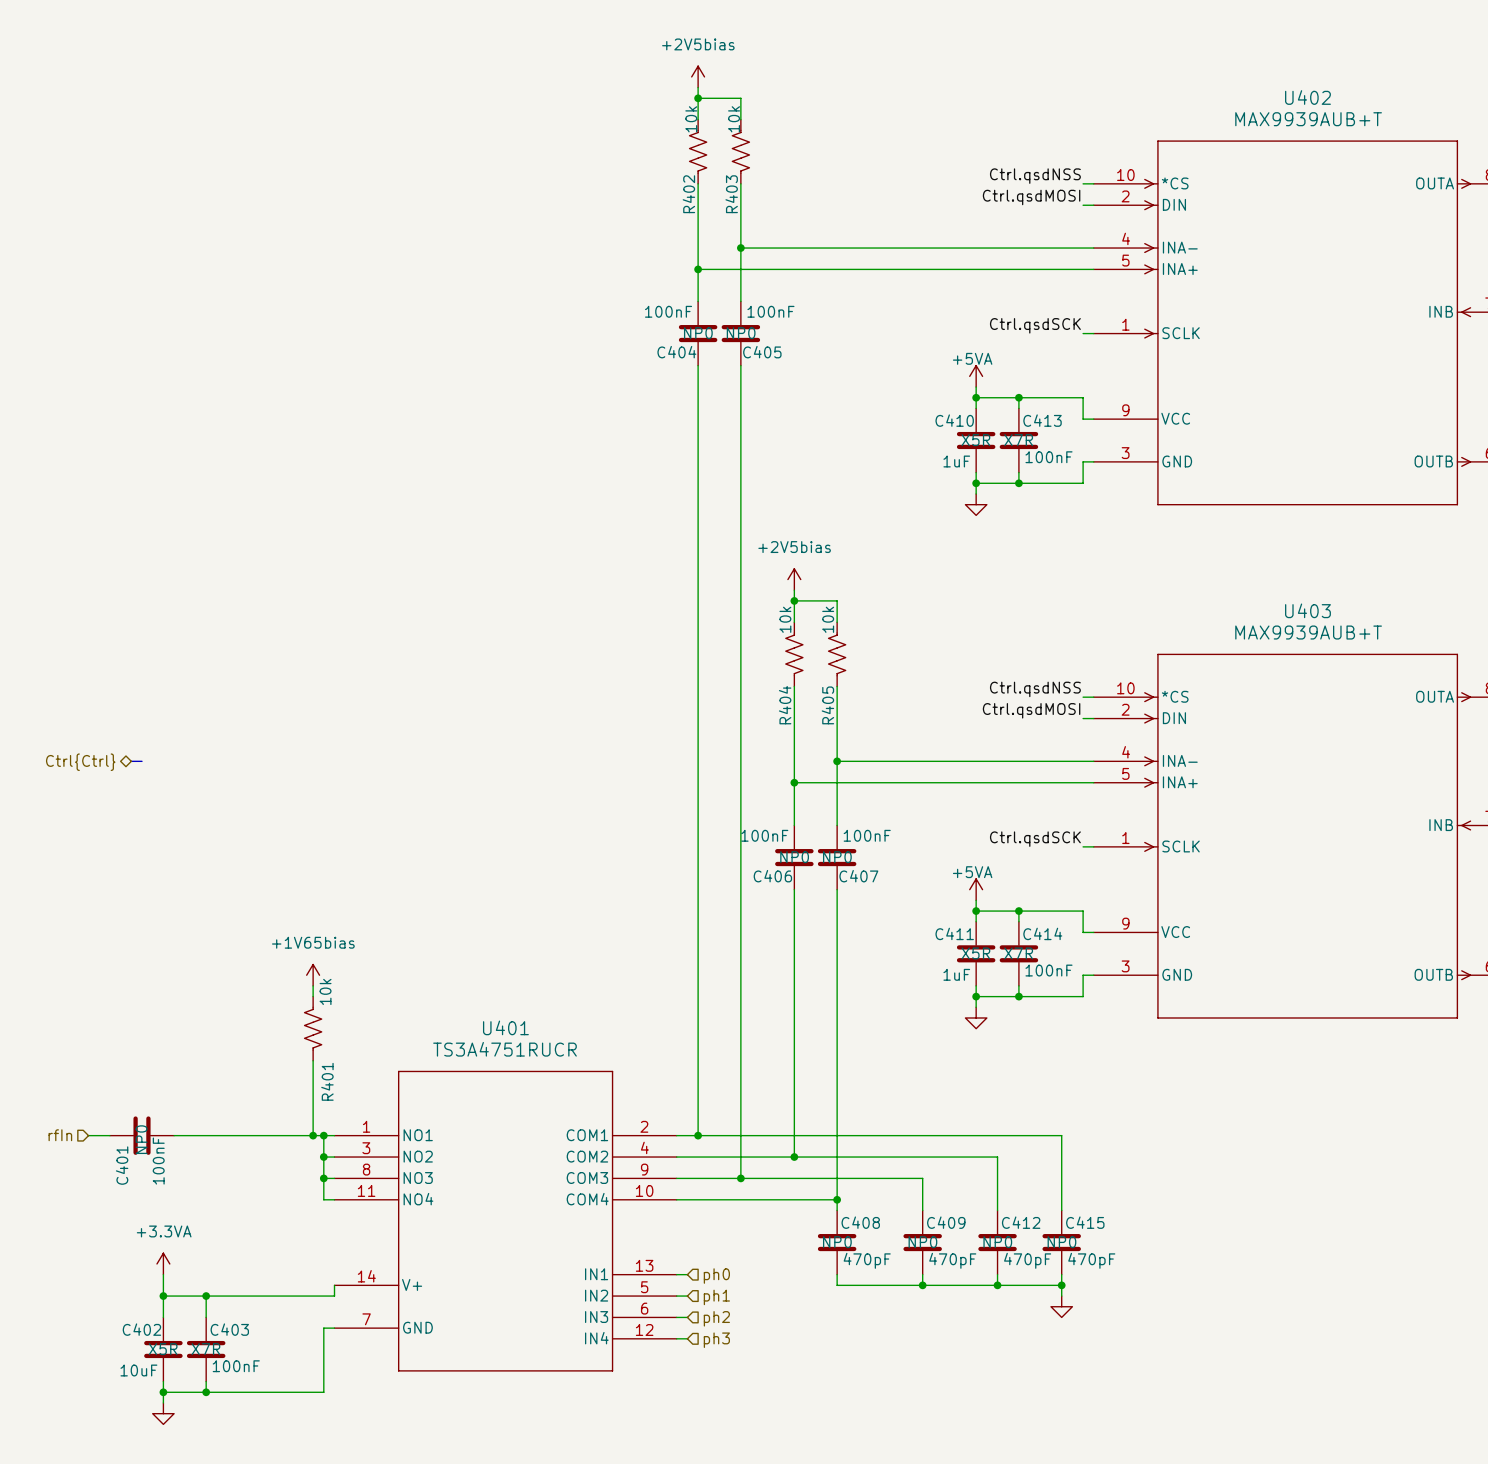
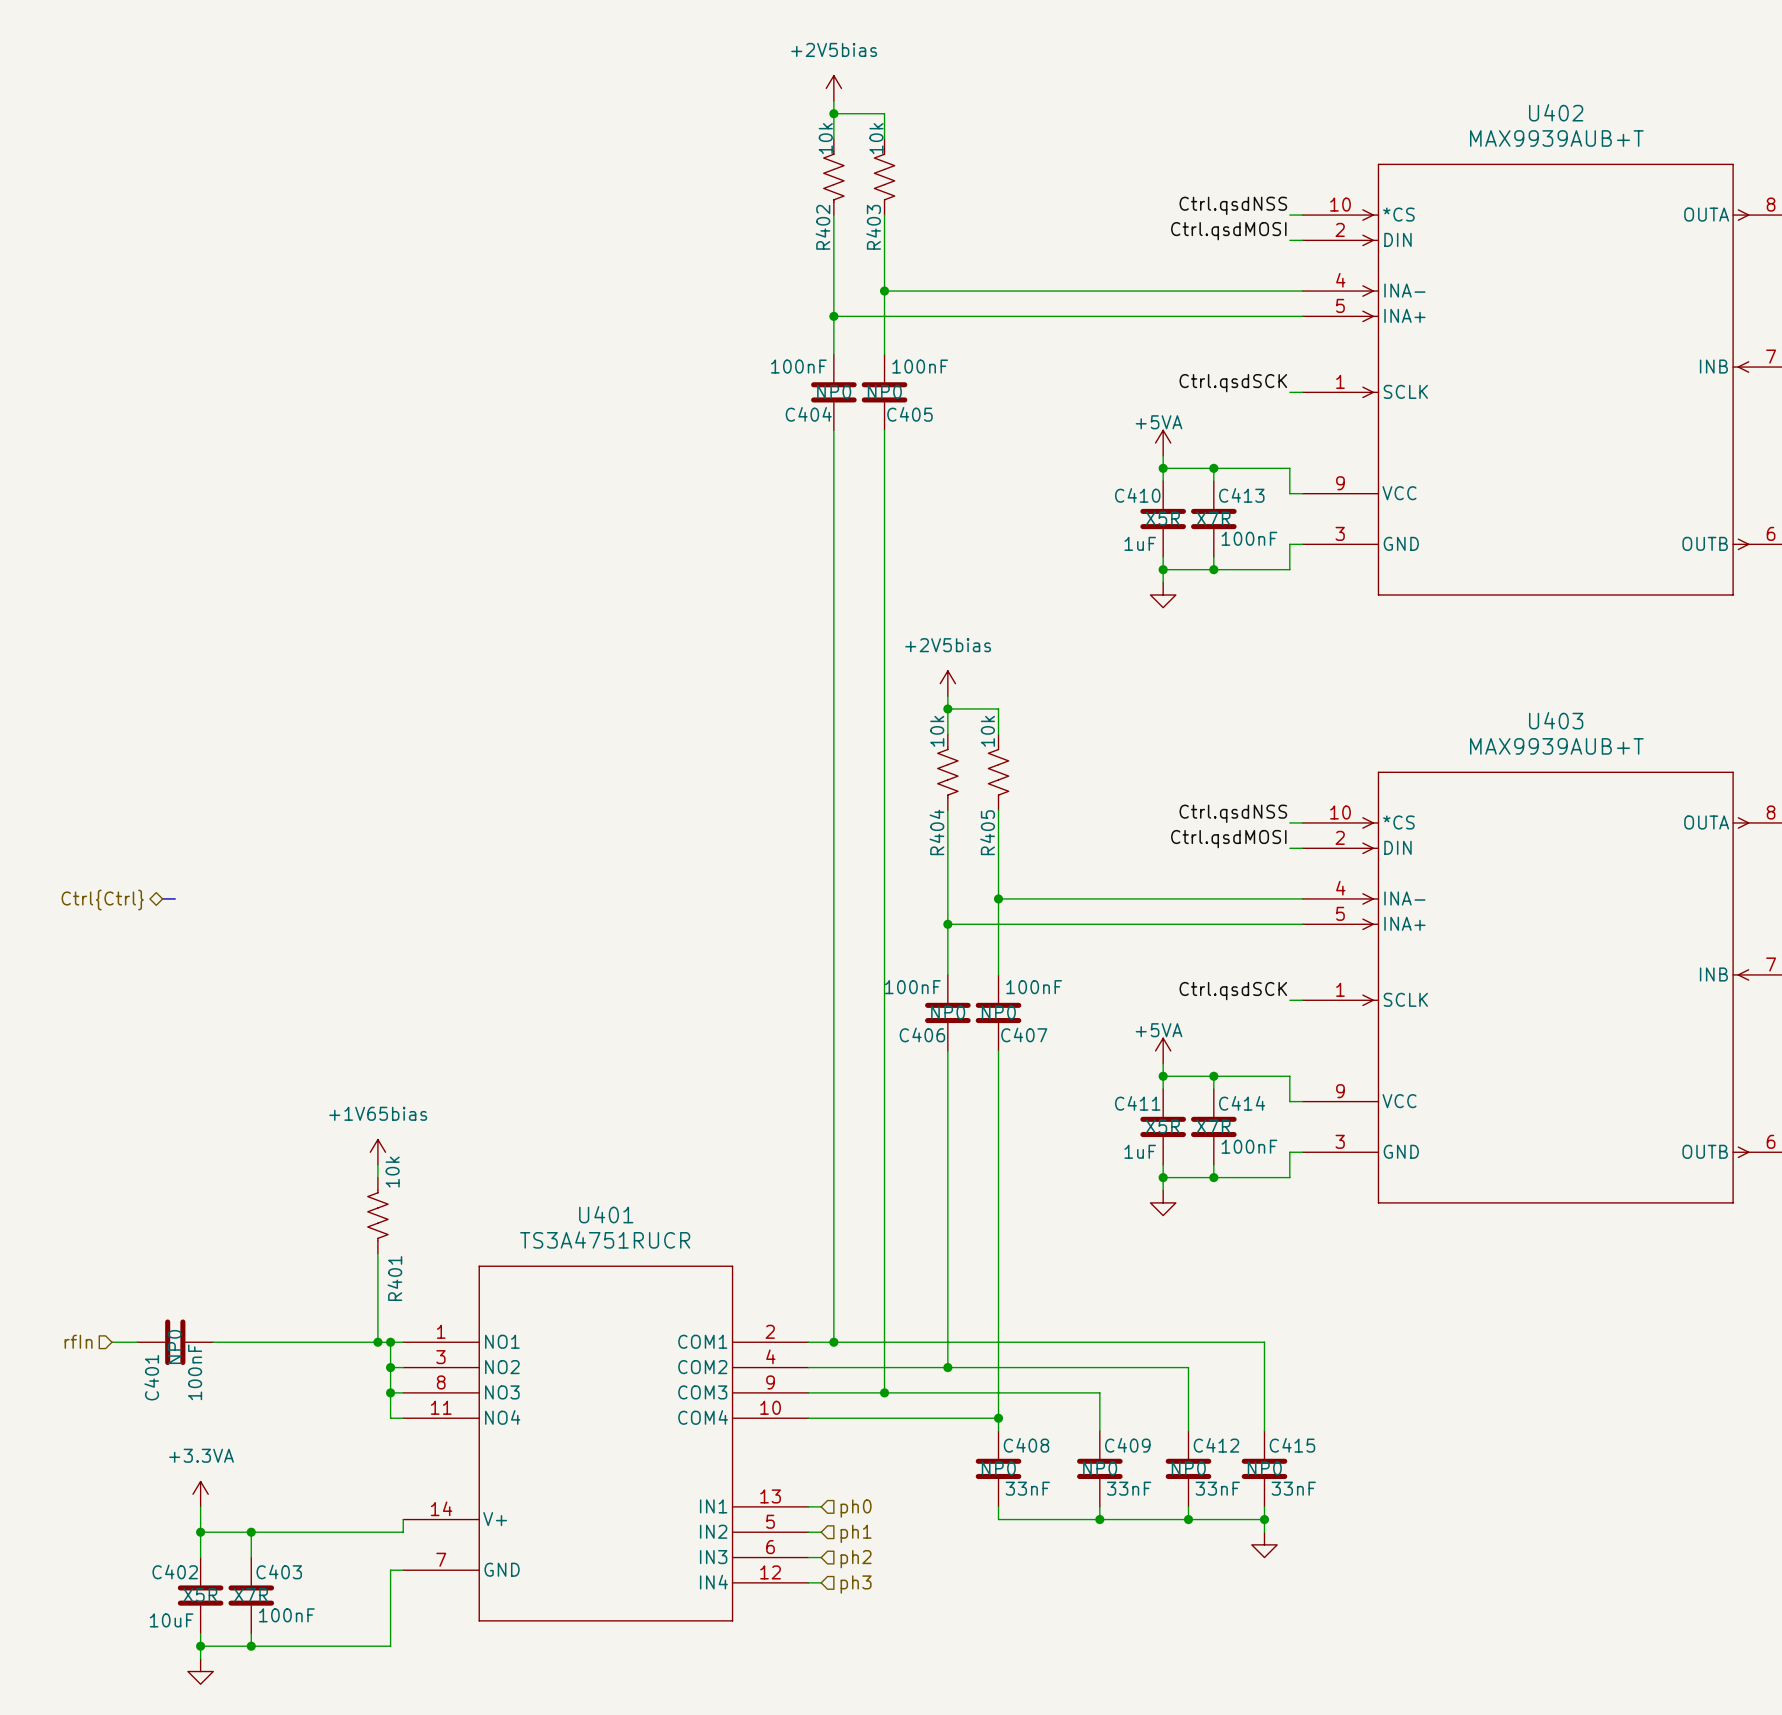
C408 value: 470pF (867, 1260) -> 33nF (1027, 1488)
C409 value: 470pF (952, 1260) -> 33nF (1129, 1488)
C412 value: 470pF (1027, 1260) -> 33nF (1217, 1488)
C415 value: 470pF (1091, 1260) -> 33nF (1293, 1488)

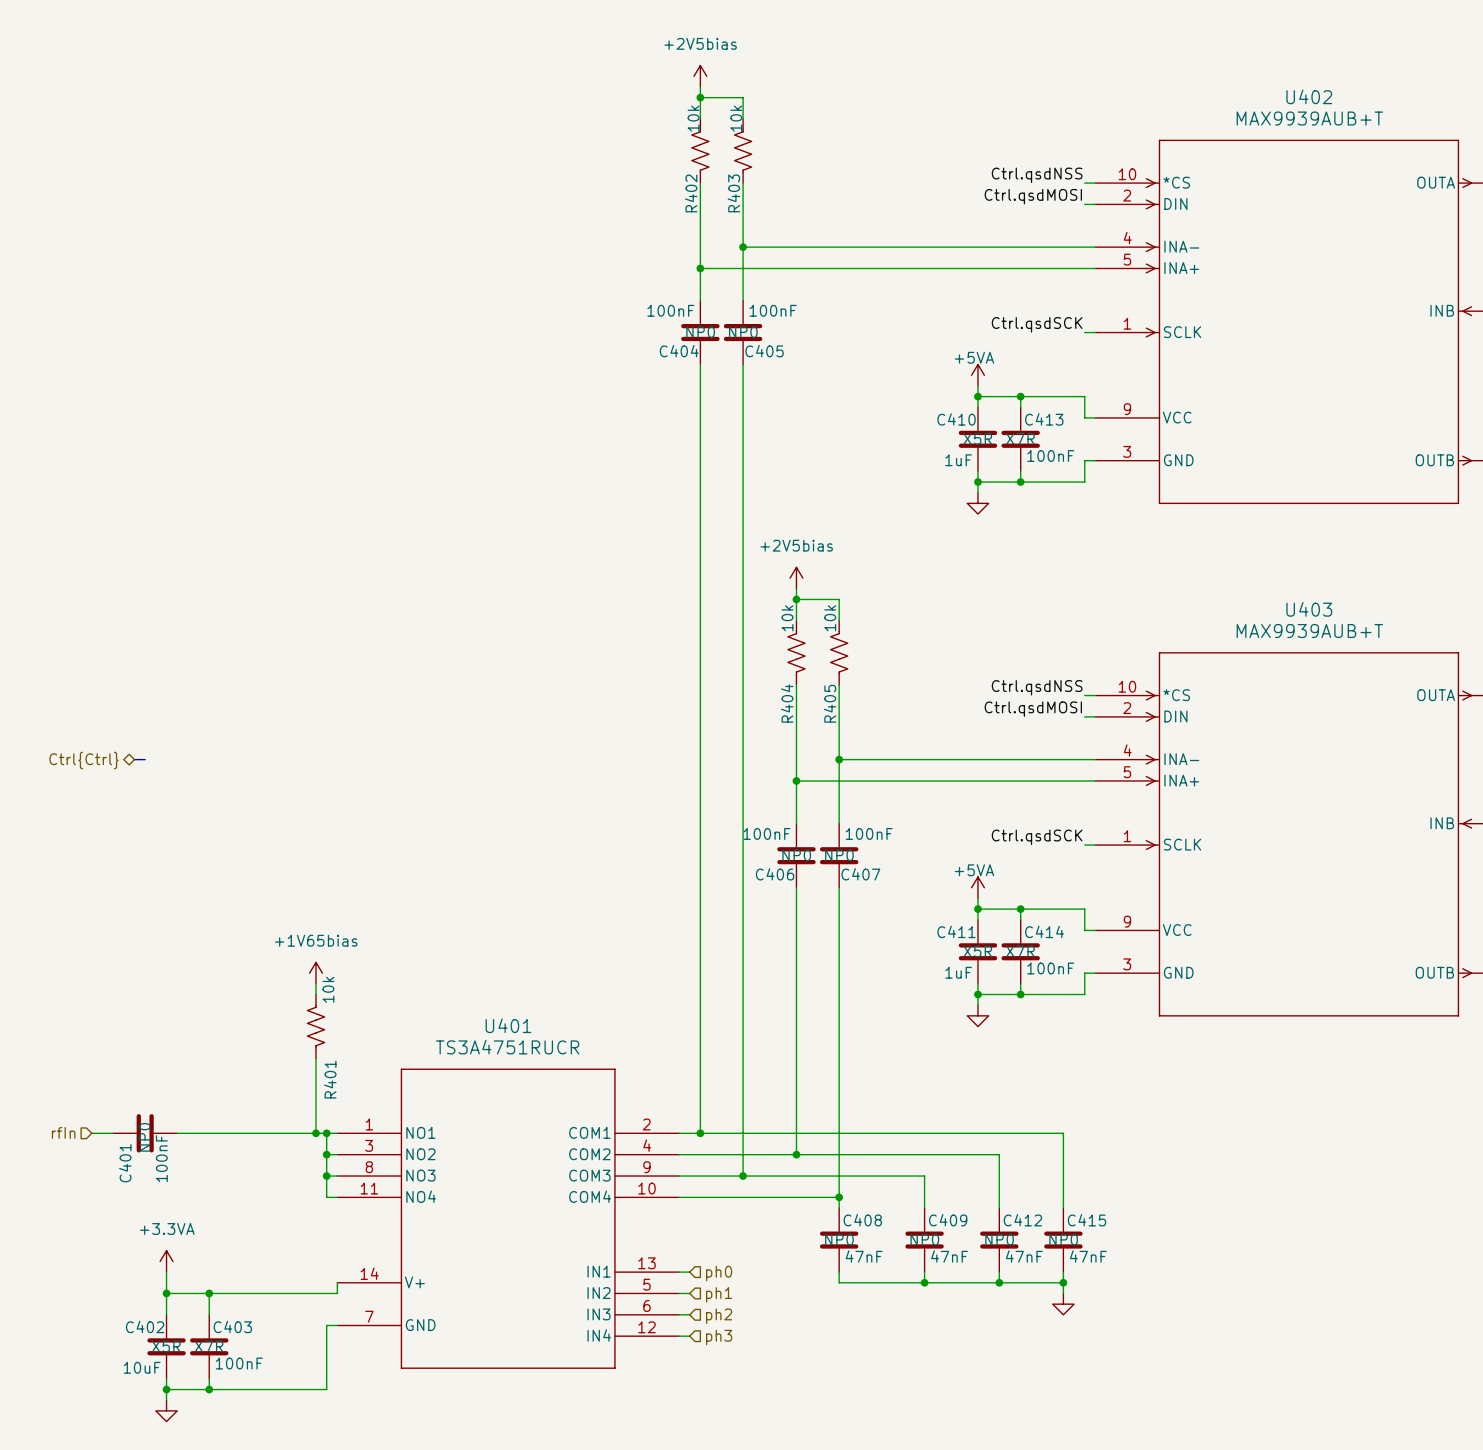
C408 value: 33nF (1027, 1488) -> 47nF (864, 1256)
C409 value: 33nF (1129, 1488) -> 47nF (949, 1256)
C412 value: 33nF (1217, 1488) -> 47nF (1024, 1256)
C415 value: 33nF (1293, 1488) -> 47nF (1088, 1256)

